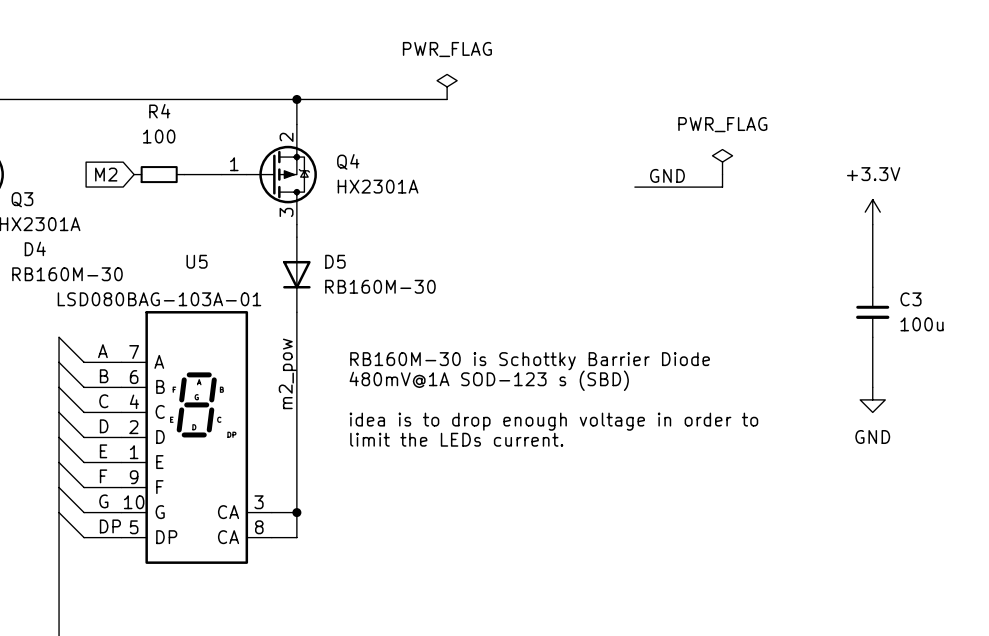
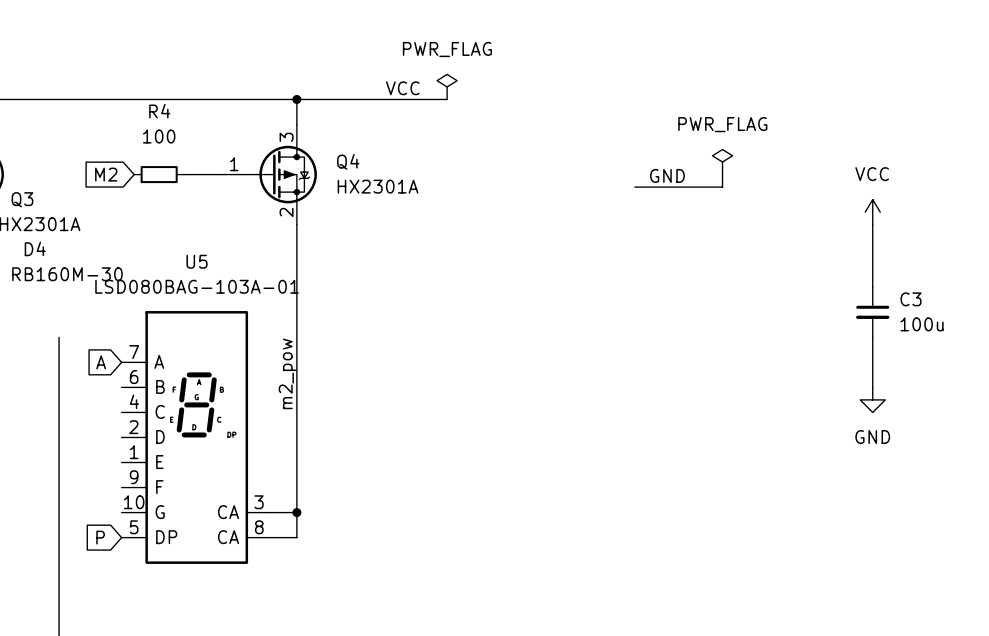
label: none -> VCC (402, 88)
Q4 flip: as is (281, 174) -> up-down (281, 174)
power symbol: +3.3V (872, 212) -> VCC (872, 212)
D5: RB160M-30 (296, 274) -> none
U5 value position: LSD080BAG-103A-01 (159, 299) -> LSD080BAG-103A-01 (197, 286)
wire: (59, 337) (84, 362) (121, 362) -> none
label: A (102, 351) -> none
text: RB160M-30 is Schottky Barrier Diode (530, 361) -> none
wire: (59, 362) (84, 387) (121, 387) -> none
global label: none -> A (101, 362)
label: B (104, 376) -> none
text: 480mV@1A SOD-123 s (SBD) (489, 380) -> none
wire: (59, 387) (84, 412) (121, 412) -> none
label: C (103, 401) -> none
wire: (59, 412) (84, 437) (121, 437) -> none
text: idea is to drop enough voltage in order to (553, 421) -> none
label: D (104, 426) -> none
wire: (59, 437) (84, 462) (121, 462) -> none
text: limit the LEDs current. (456, 439) -> none
label: E (103, 451) -> none
wire: (59, 462) (84, 487) (121, 487) -> none
label: F (103, 476) -> none
wire: (59, 487) (84, 512) (121, 512) -> none
label: G (103, 501) -> none
wire: (59, 512) (84, 537) (121, 537) -> none
label: DP (110, 526) -> none
global label: none -> P (100, 537)

